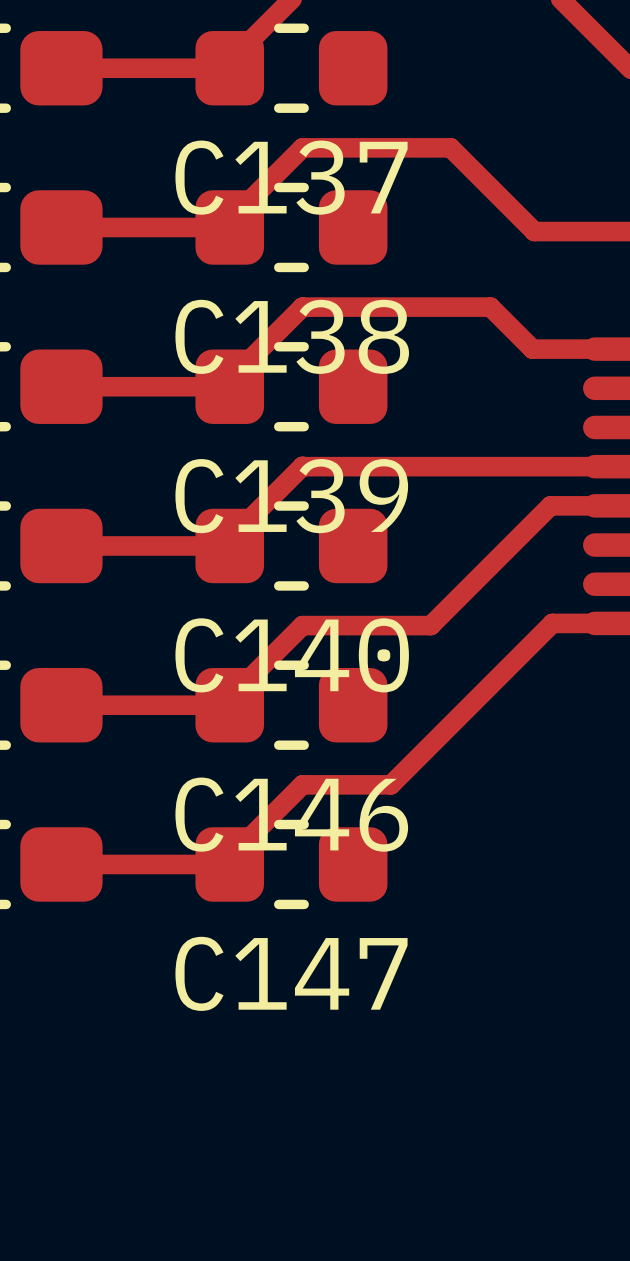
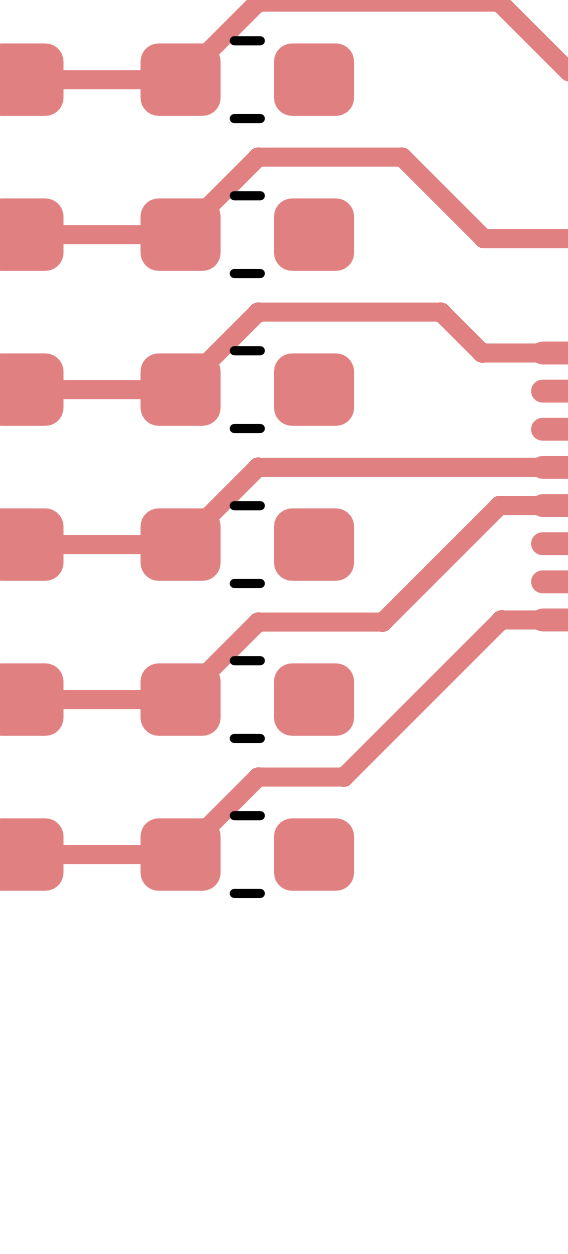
C137: (291, 68) -> none
part: none -> (247, 79)
C138: (291, 227) -> none
part: none -> (247, 234)
C139: (291, 386) -> none
part: none -> (247, 389)
C140: (291, 545) -> none
part: none -> (247, 544)
C146: (291, 705) -> none
part: none -> (247, 699)
C147: (291, 864) -> none
part: none -> (247, 854)

